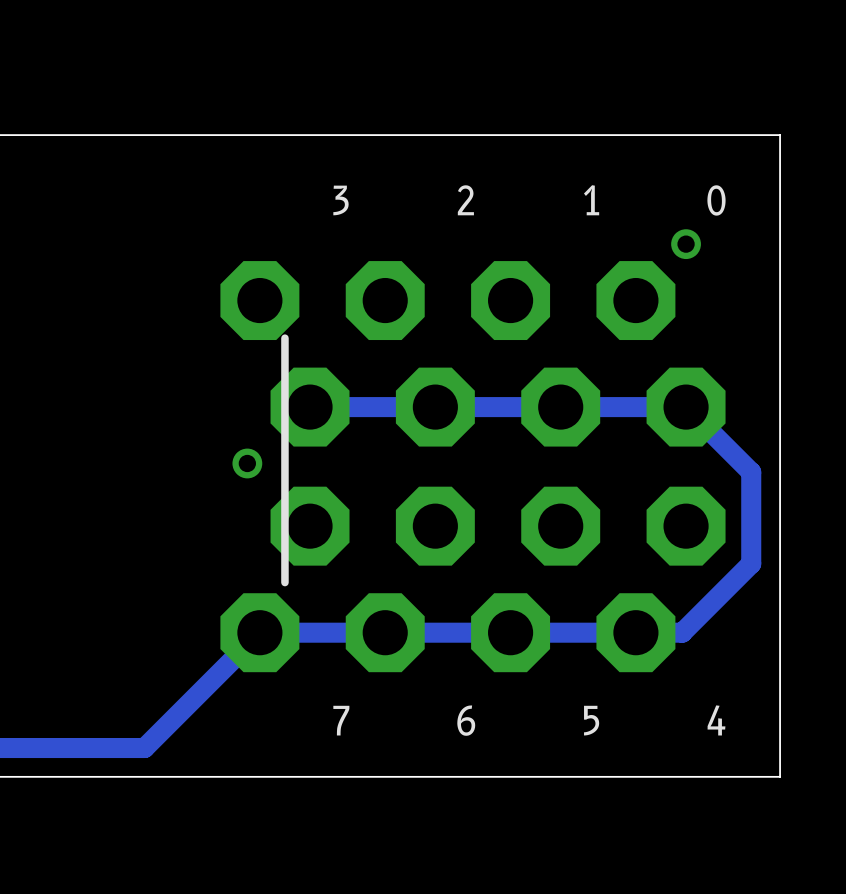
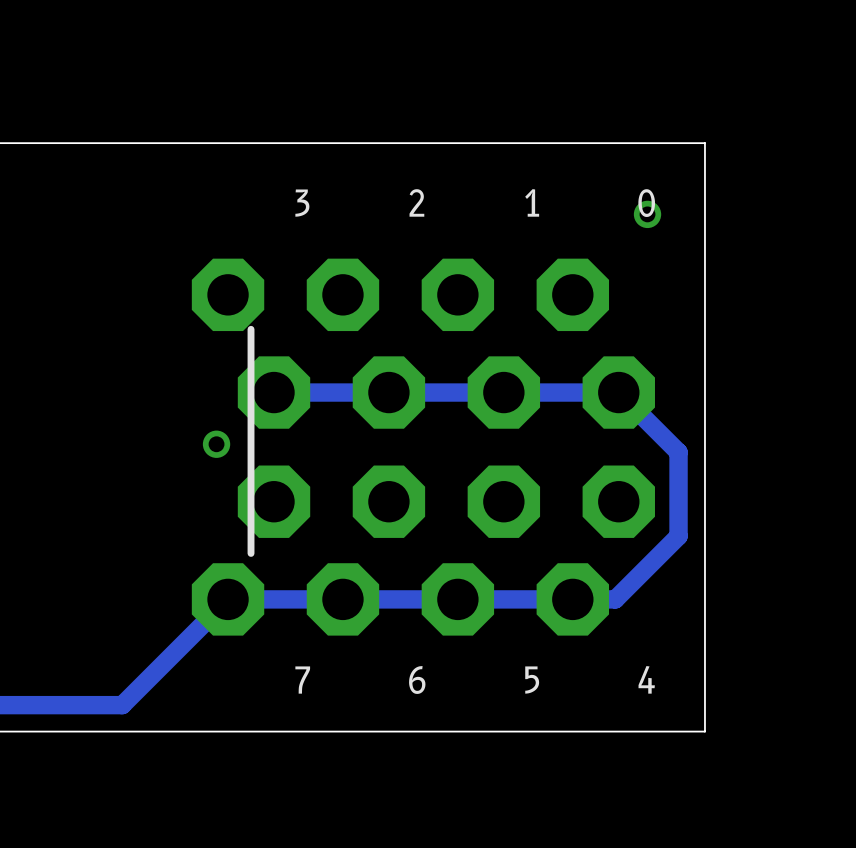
via position: (686, 244) -> (647, 214)

